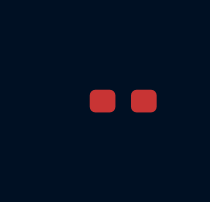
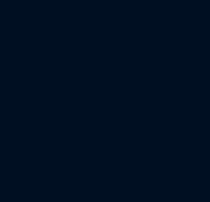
part: (123, 101) -> none

